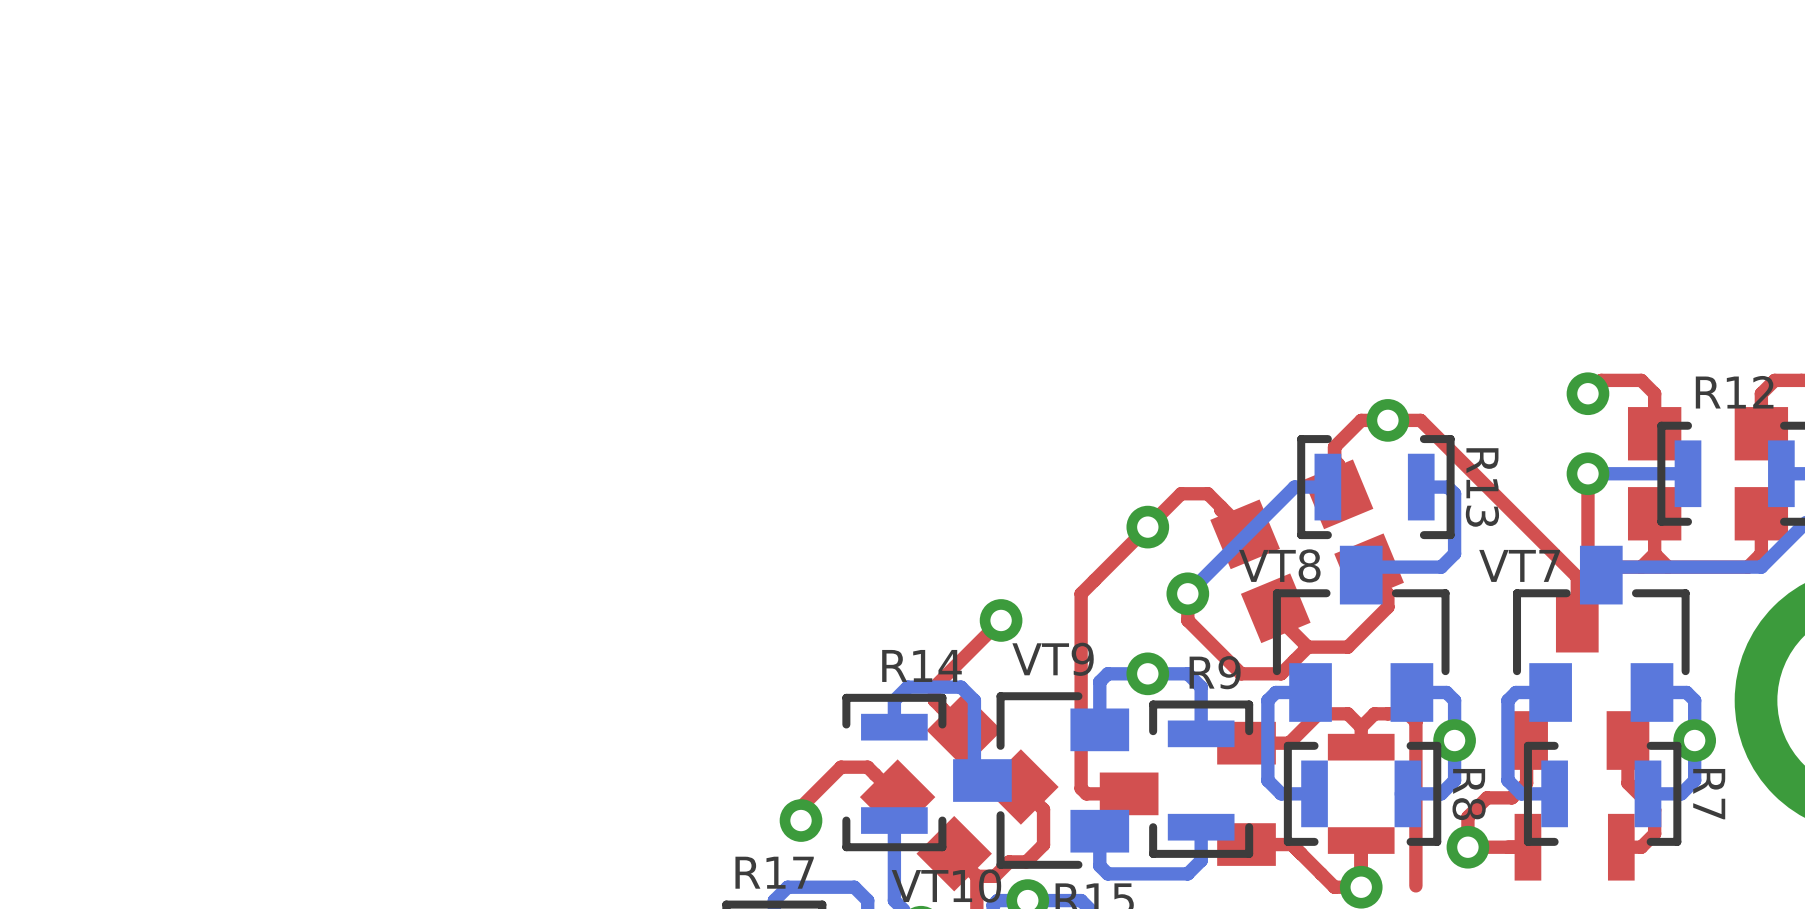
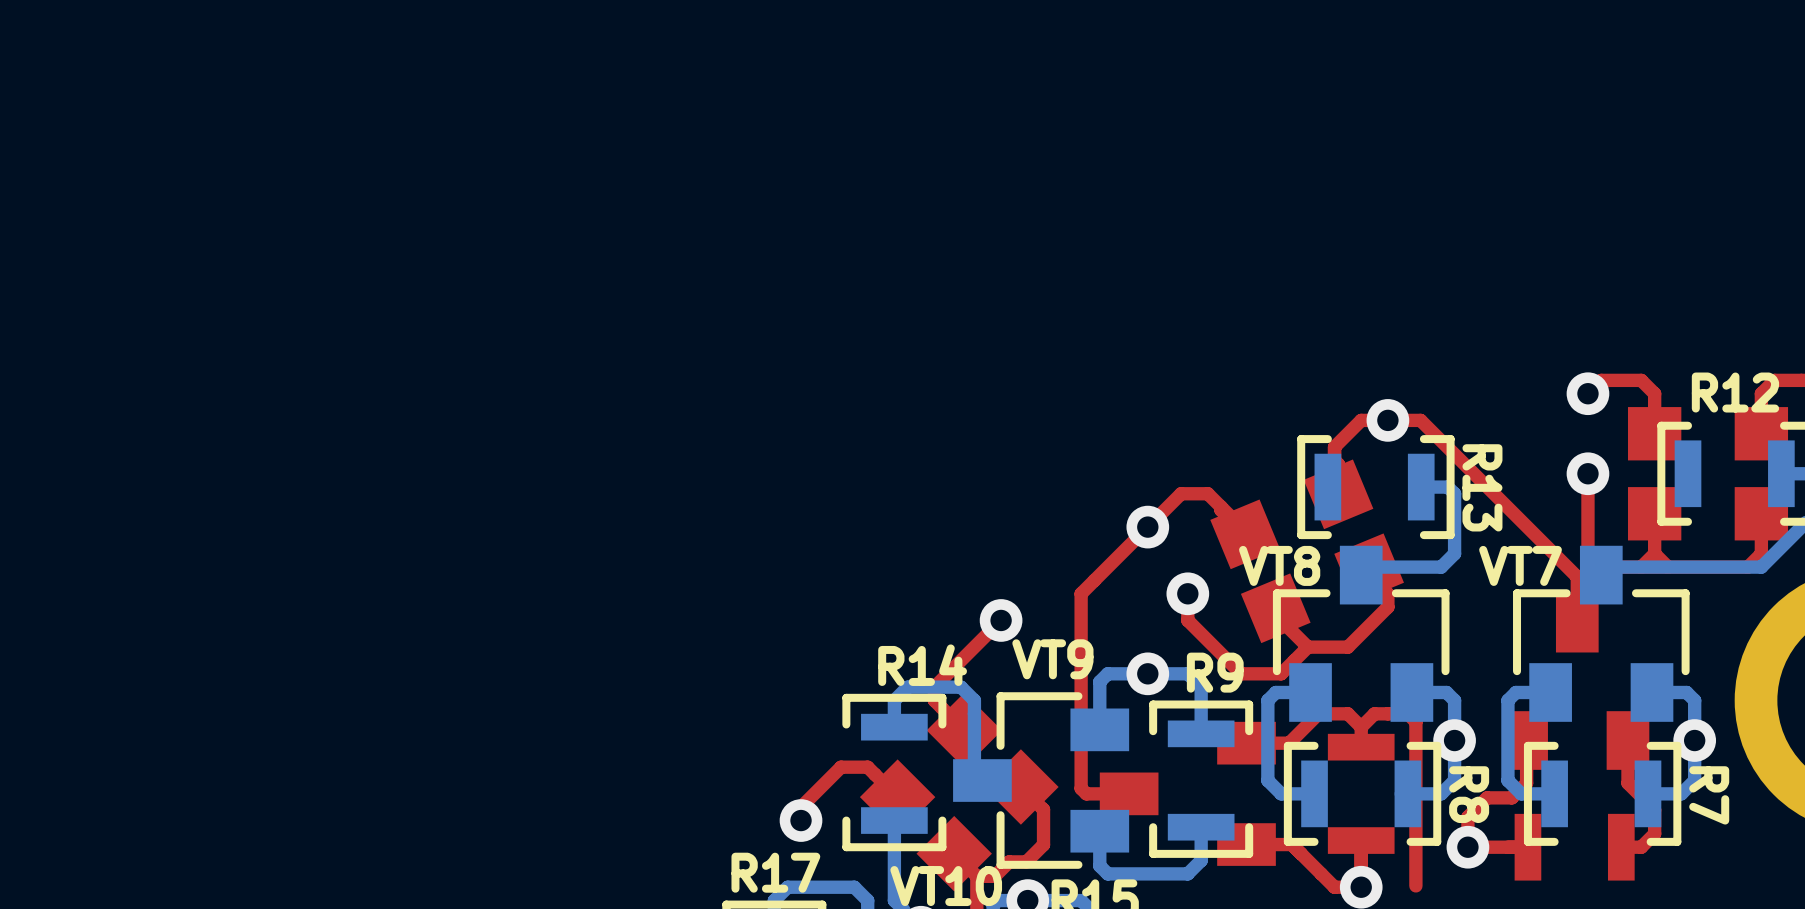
bottom track: (1688, 473) (1587, 473) -> none
bottom track: (1327, 487) (1294, 487) (1187, 593) -> none

